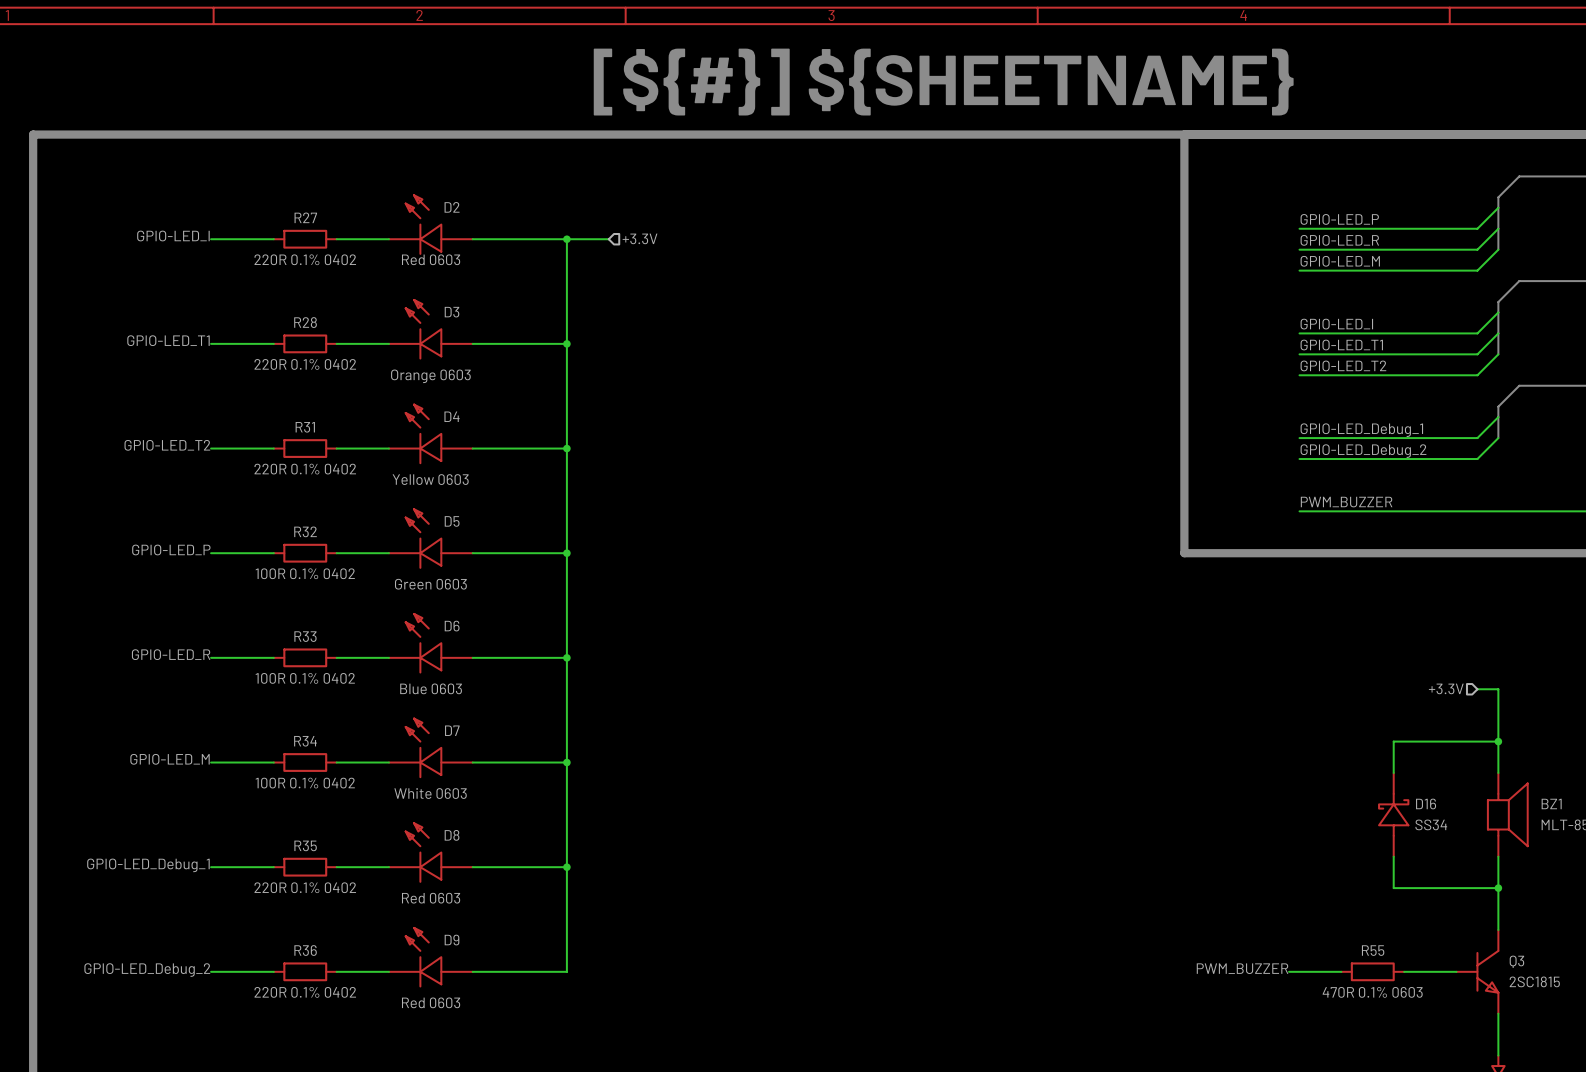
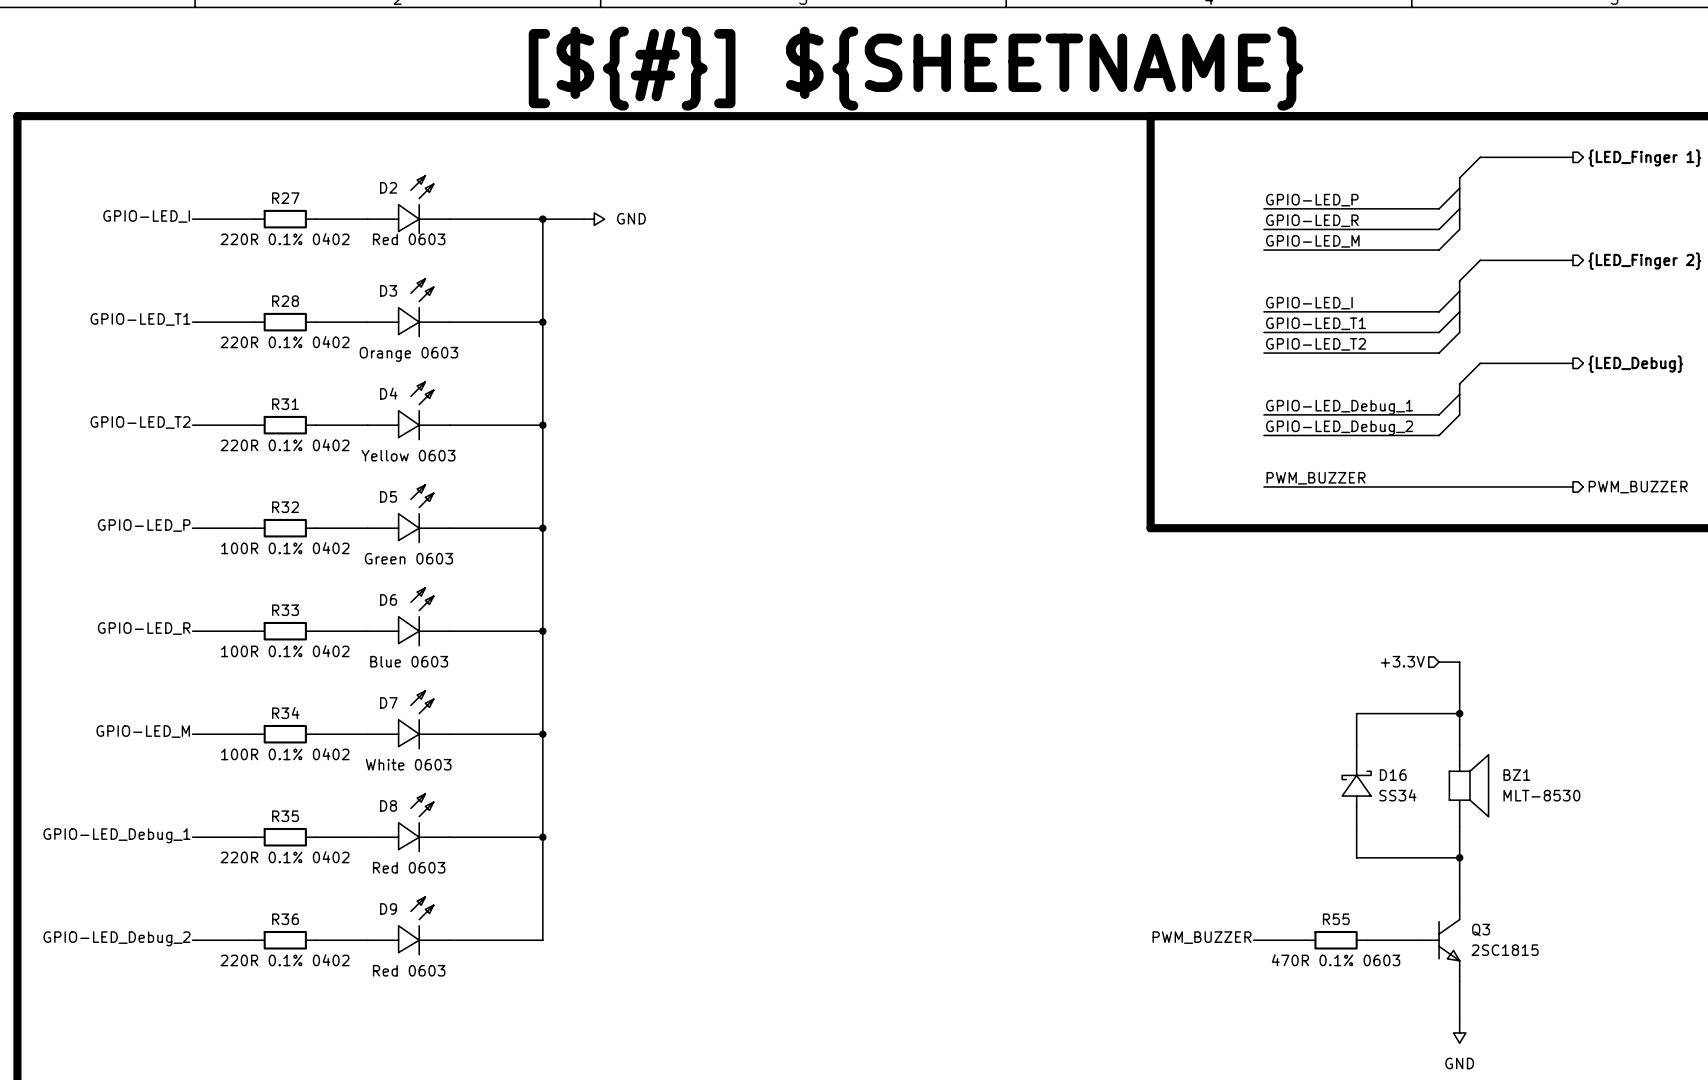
D2 flip: as is (423, 224) -> left-right (416, 204)
hierarchical label: +3.3V (640, 238) -> none
power symbol: none -> GND (594, 219)
D3 flip: as is (423, 329) -> left-right (416, 307)
D4 flip: as is (423, 433) -> left-right (416, 410)
D5 flip: as is (423, 538) -> left-right (416, 513)
D6 flip: as is (423, 643) -> left-right (416, 616)
D7 flip: as is (423, 747) -> left-right (416, 719)
D8 flip: as is (423, 852) -> left-right (416, 822)
D9 flip: as is (423, 957) -> left-right (416, 925)

